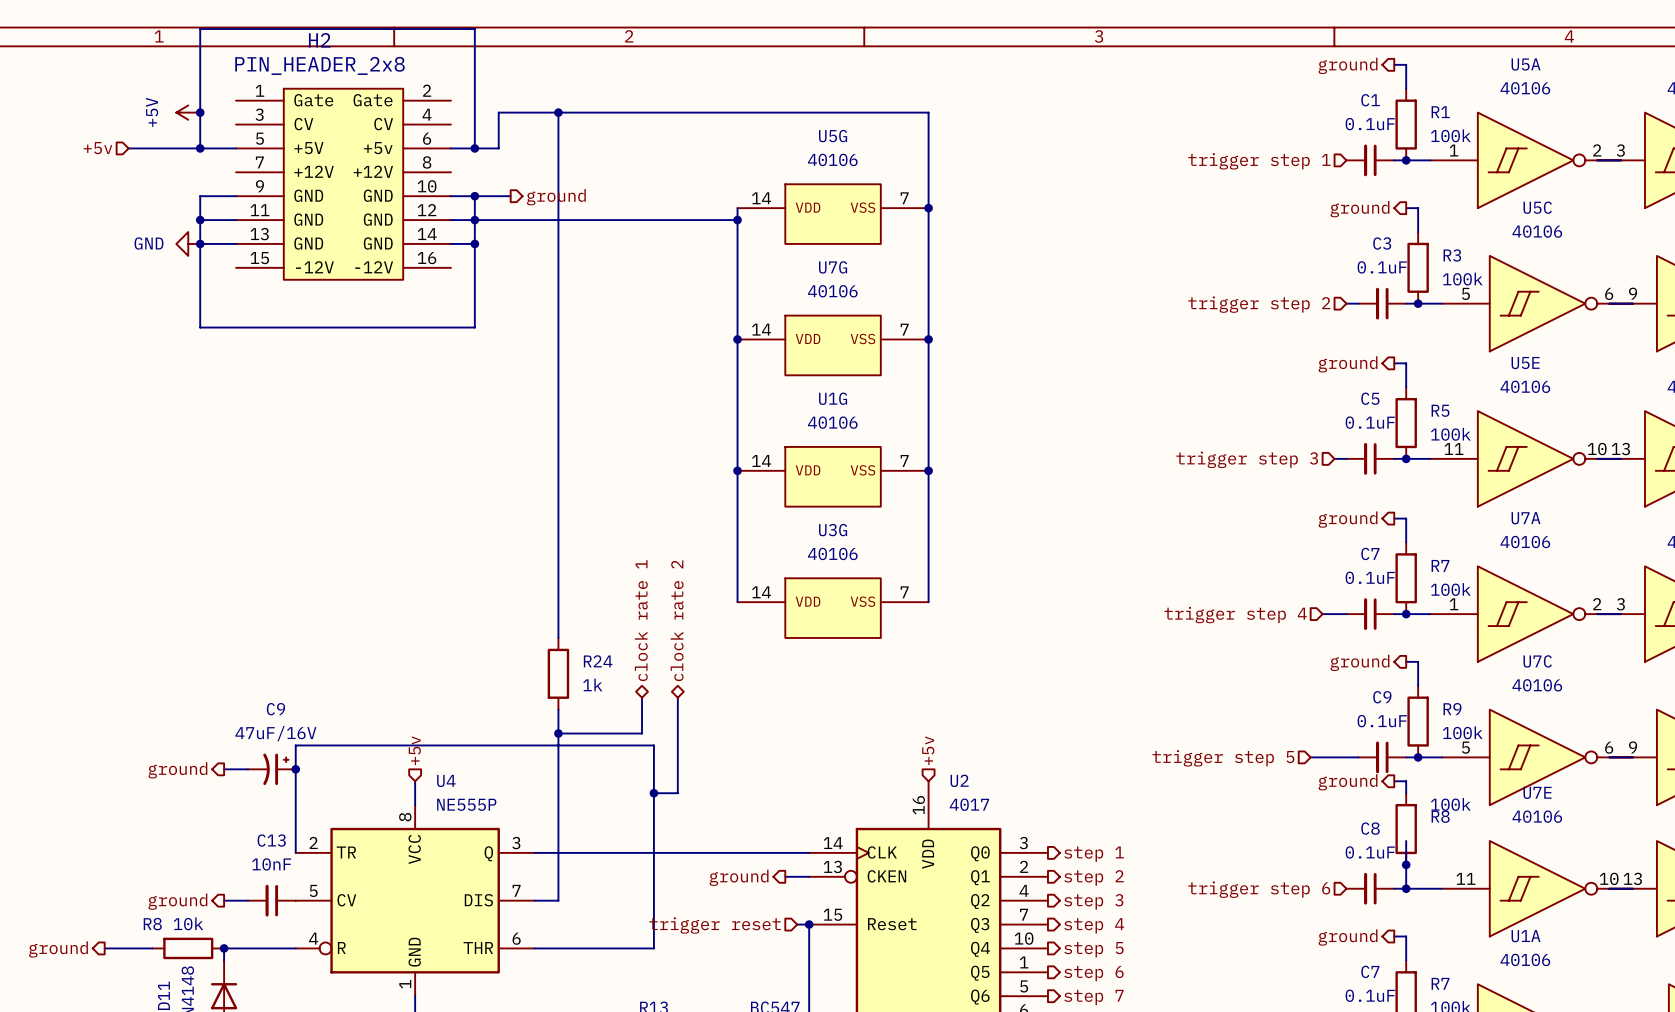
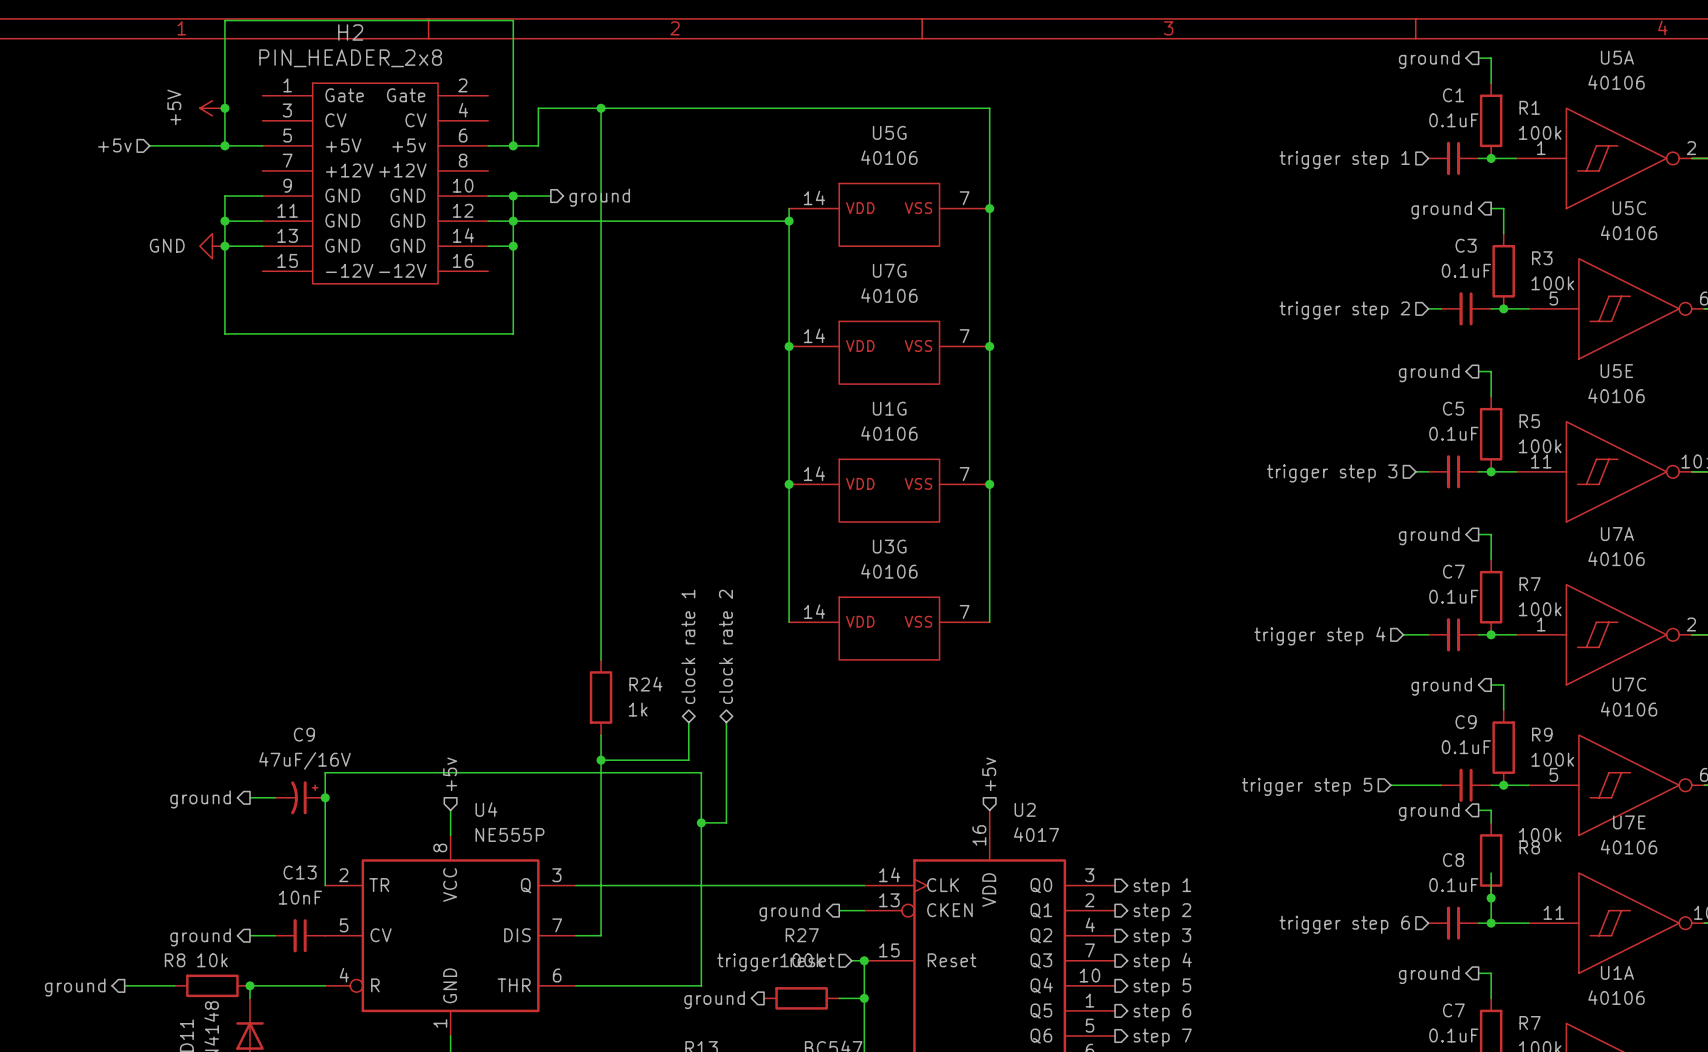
R27: none -> (801, 998)
wire: none -> (839, 998) (864, 998)
junction: none -> (864, 998)
hierarchical label: none -> ground (714, 1000)

